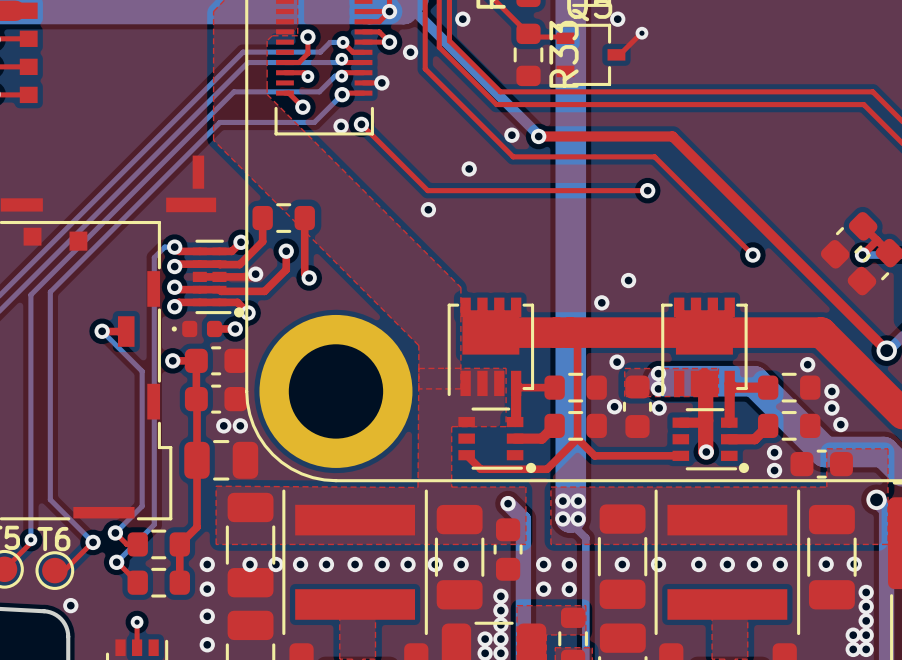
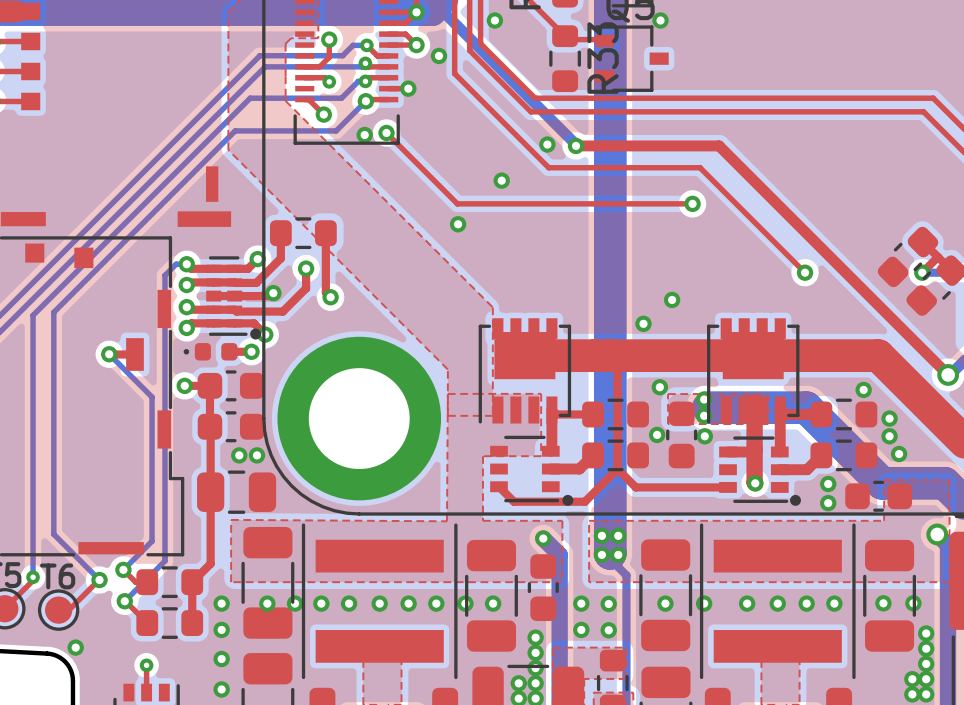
top track: (641, 33) (619, 54) (616, 54) -> none
via: (641, 33) -> none

